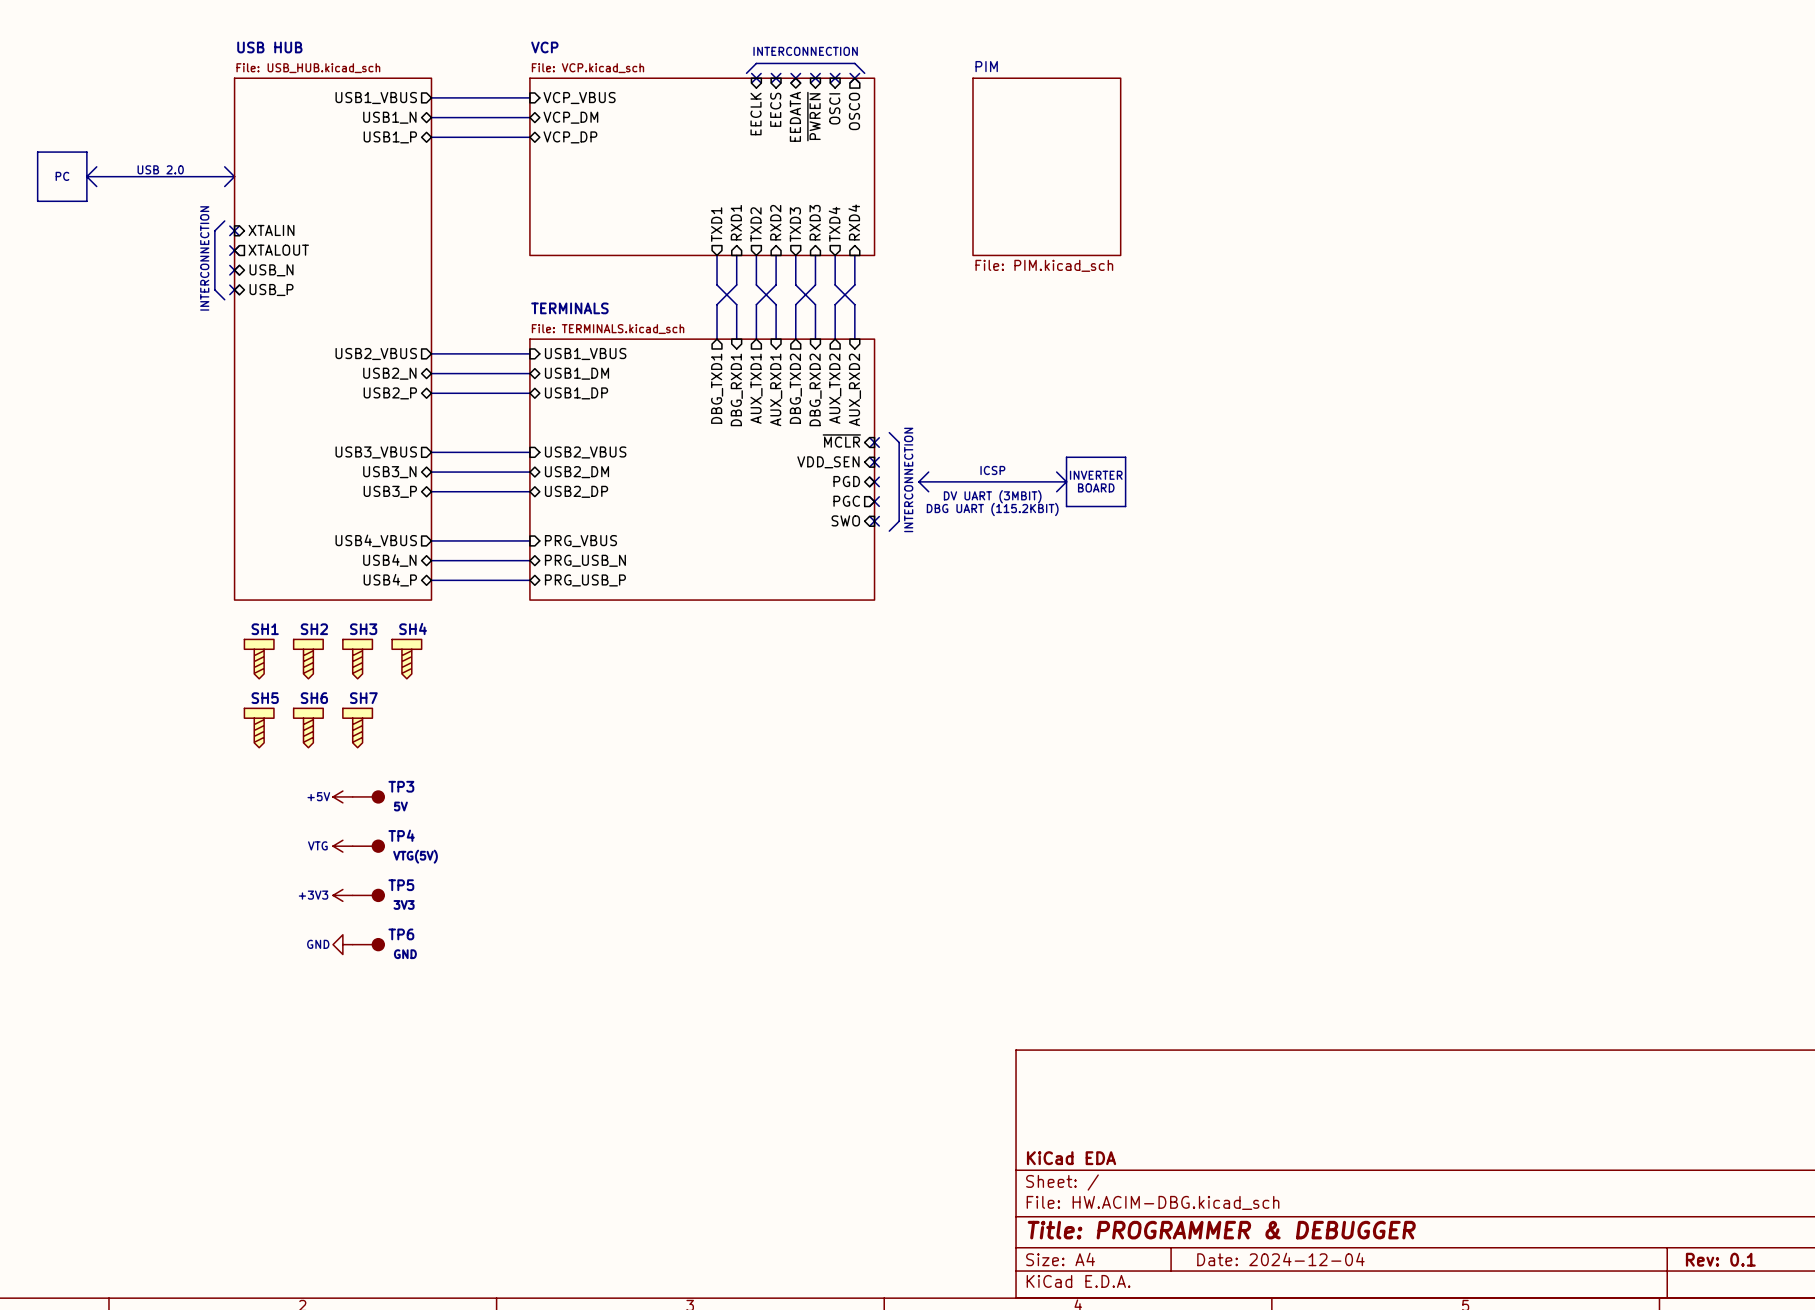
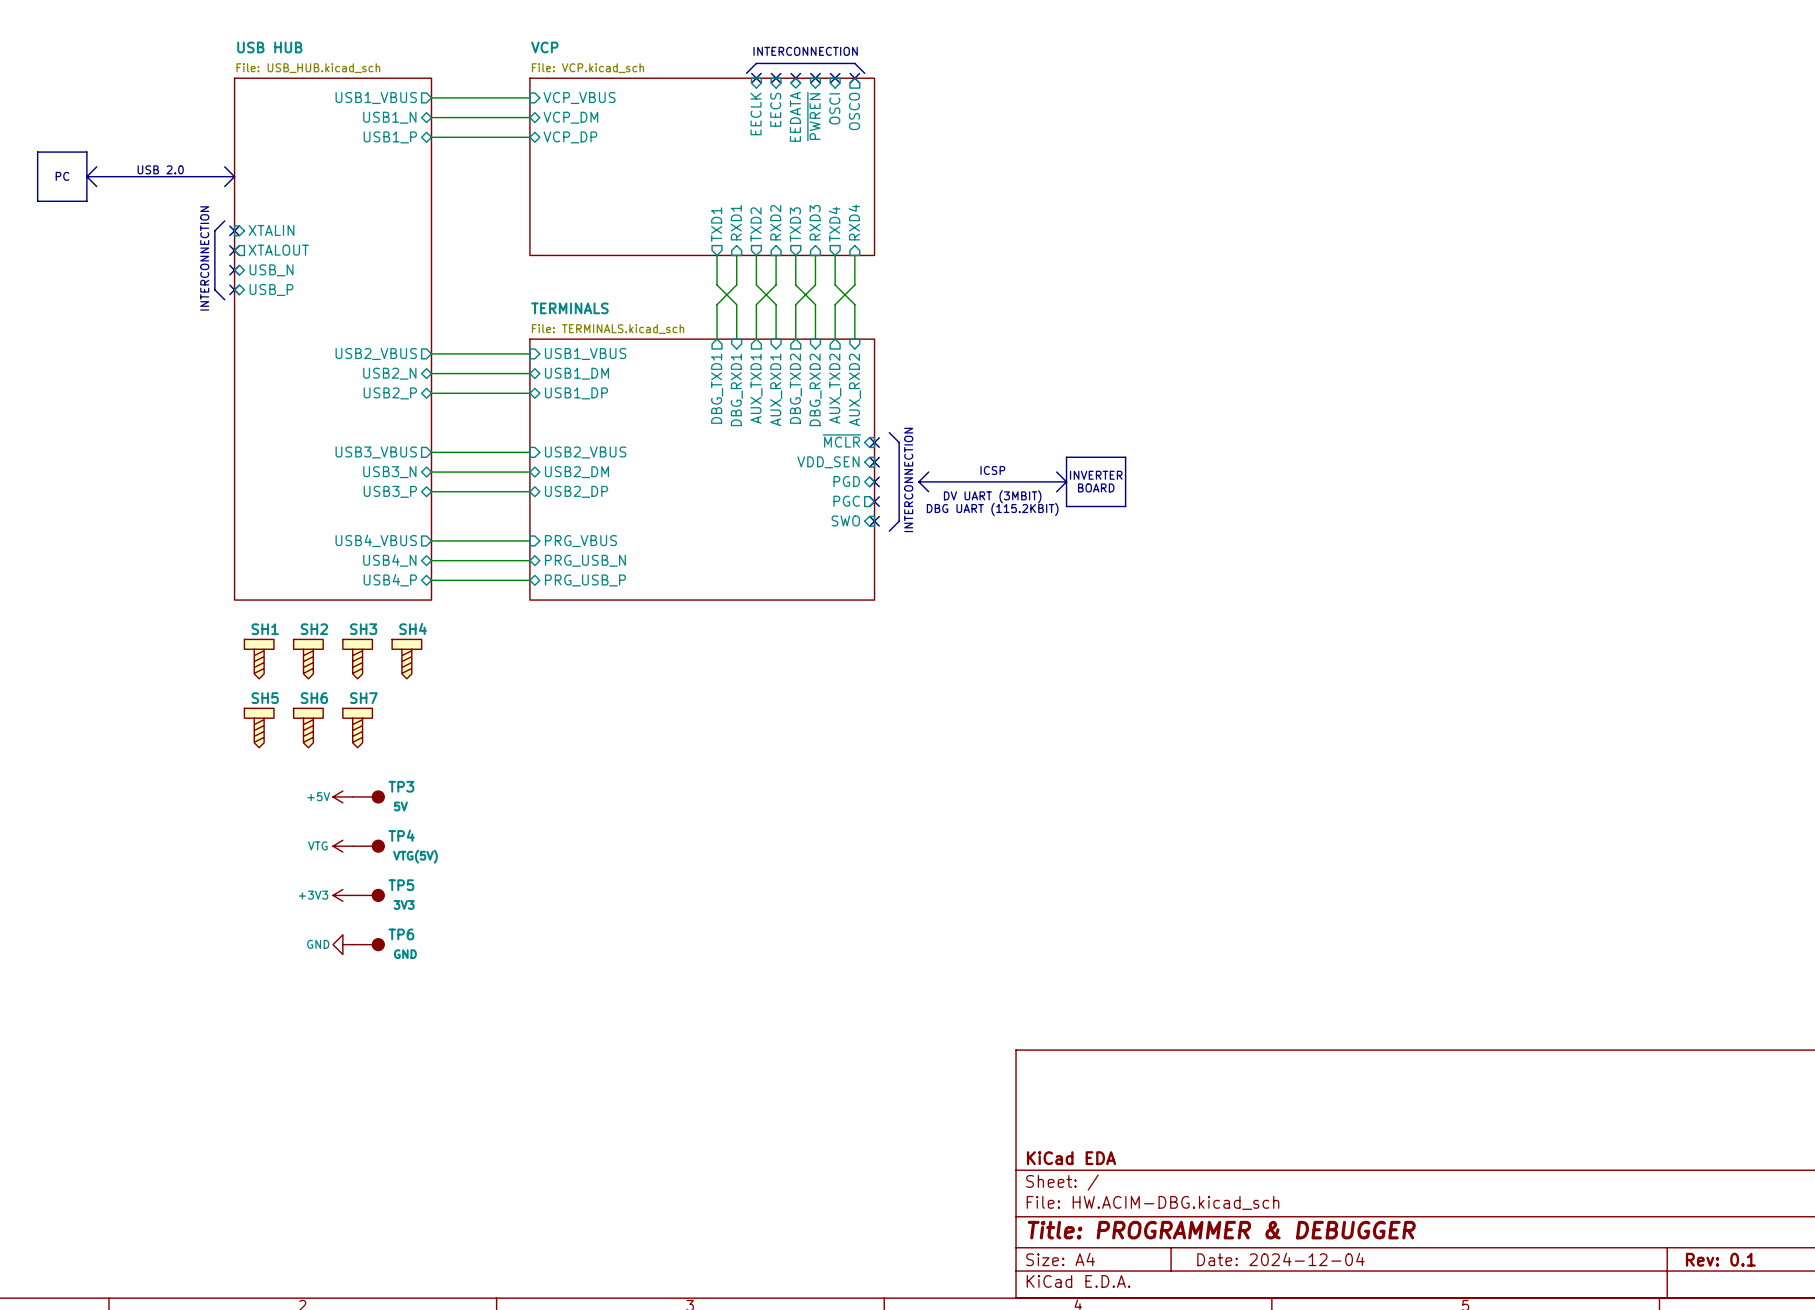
sheet PIM: File: PIM.kicad_sch (1046, 166) -> none

